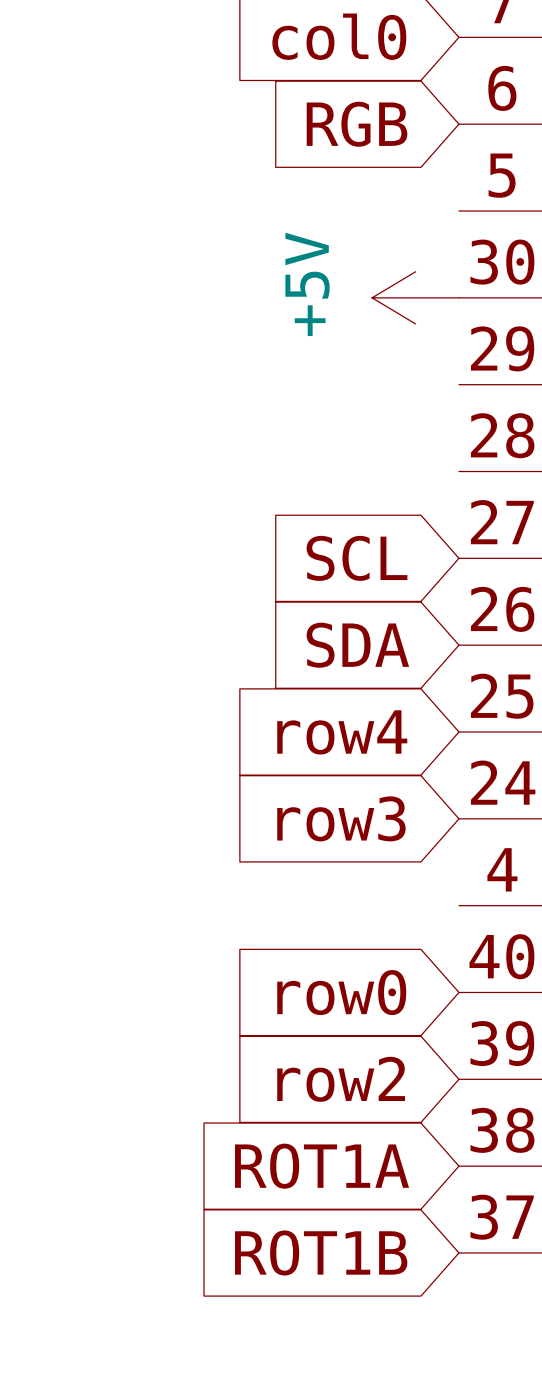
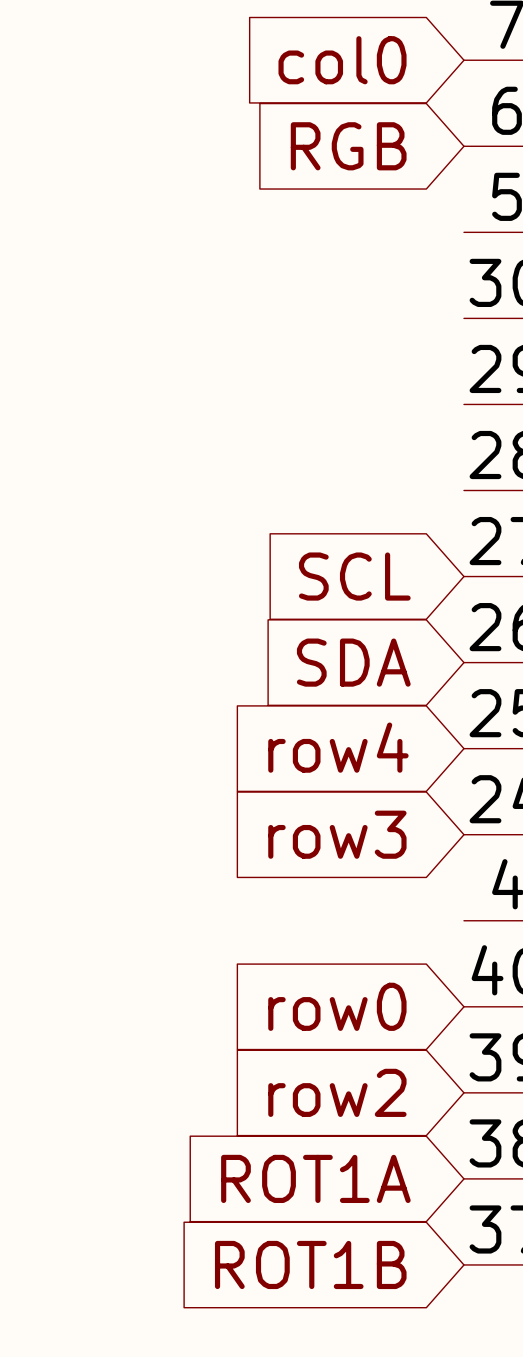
power symbol: +5V (415, 297) -> none

